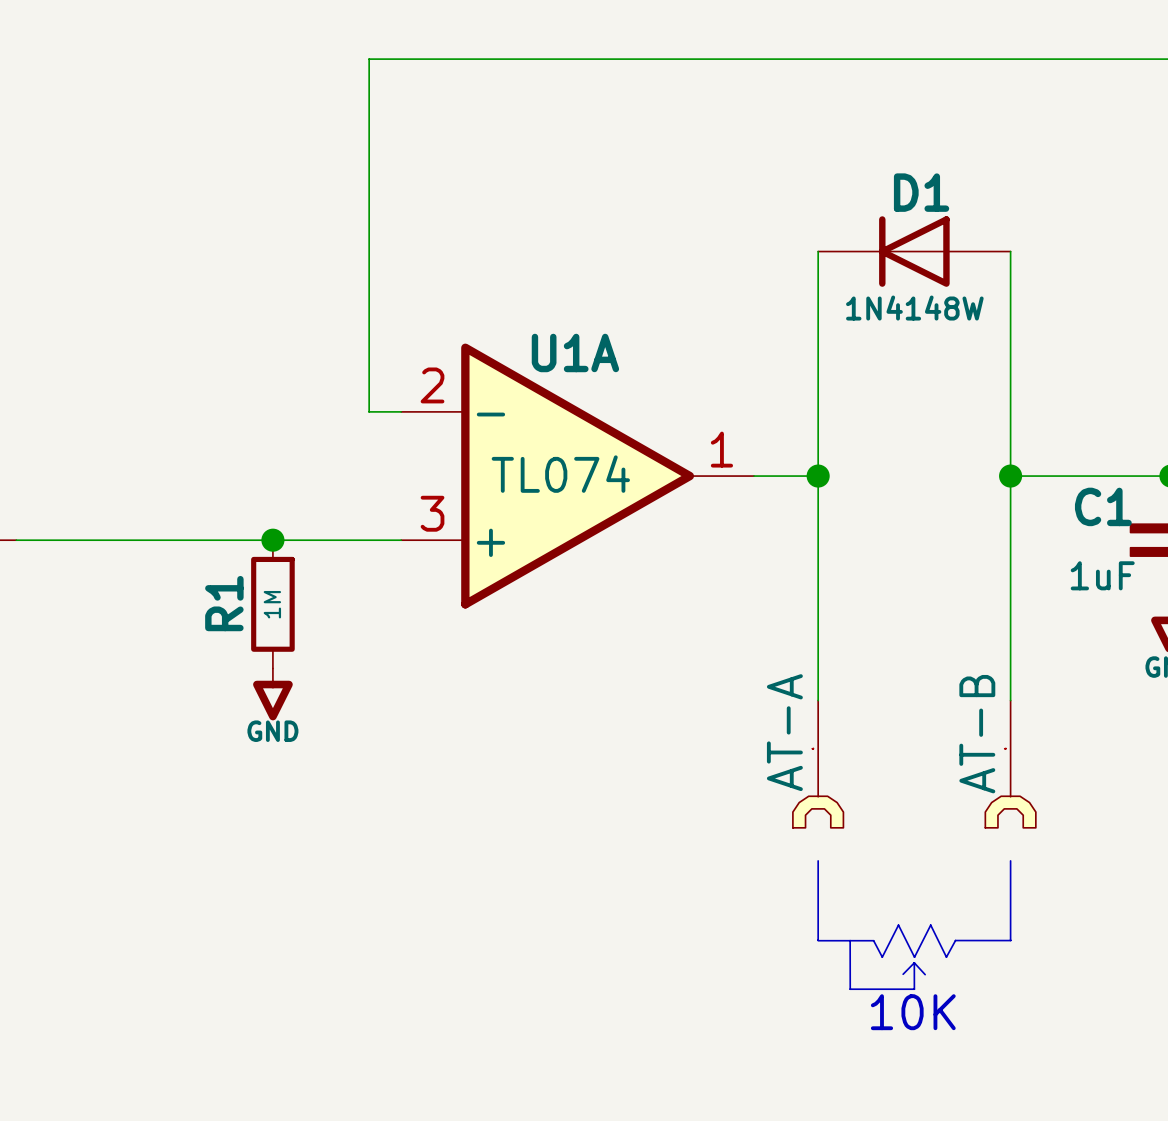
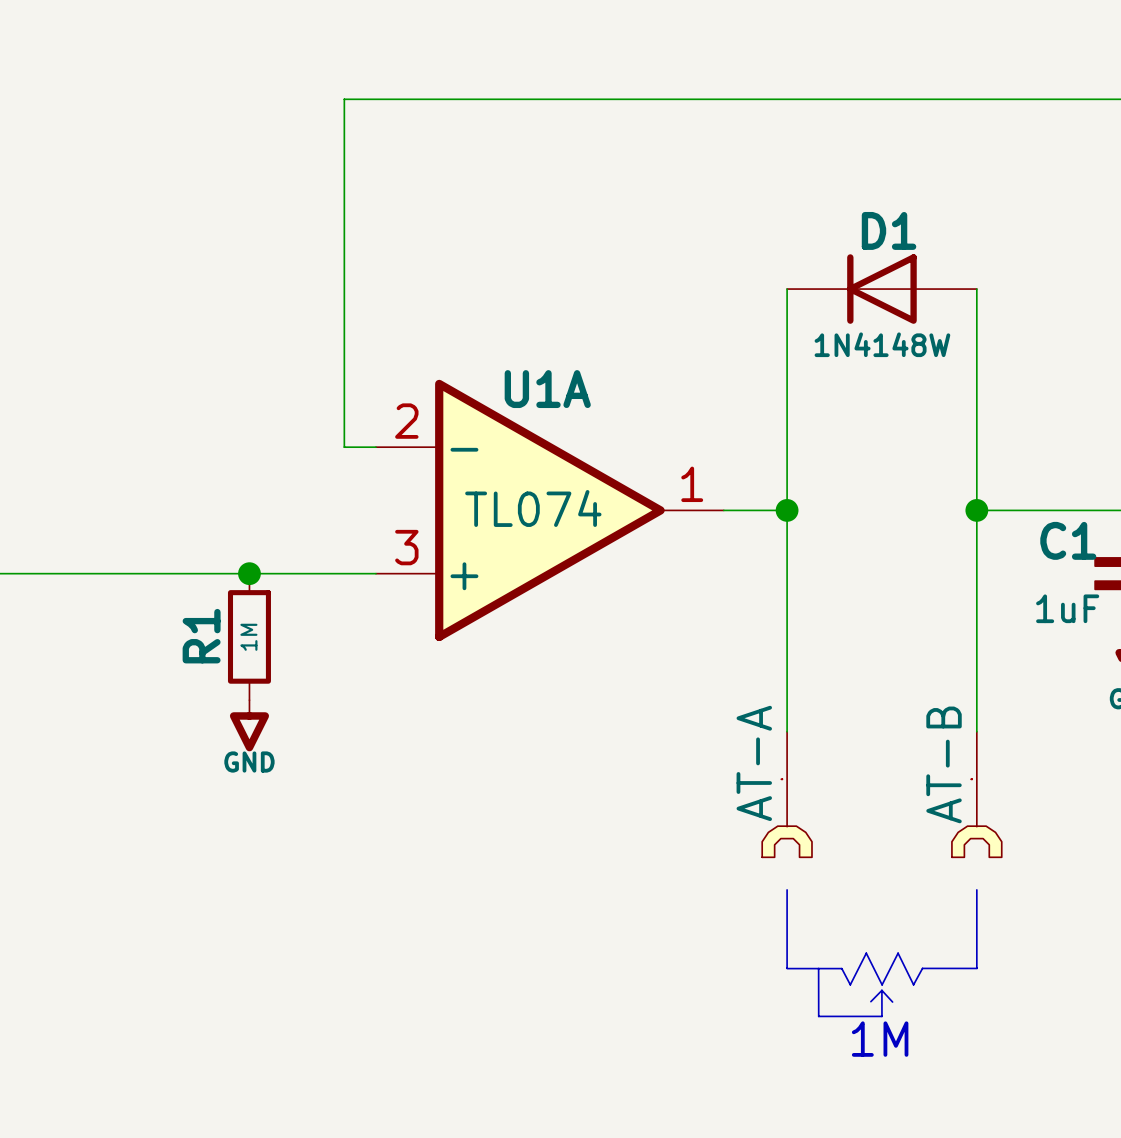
text: 10K (913, 1012) -> 1M (880, 1039)

